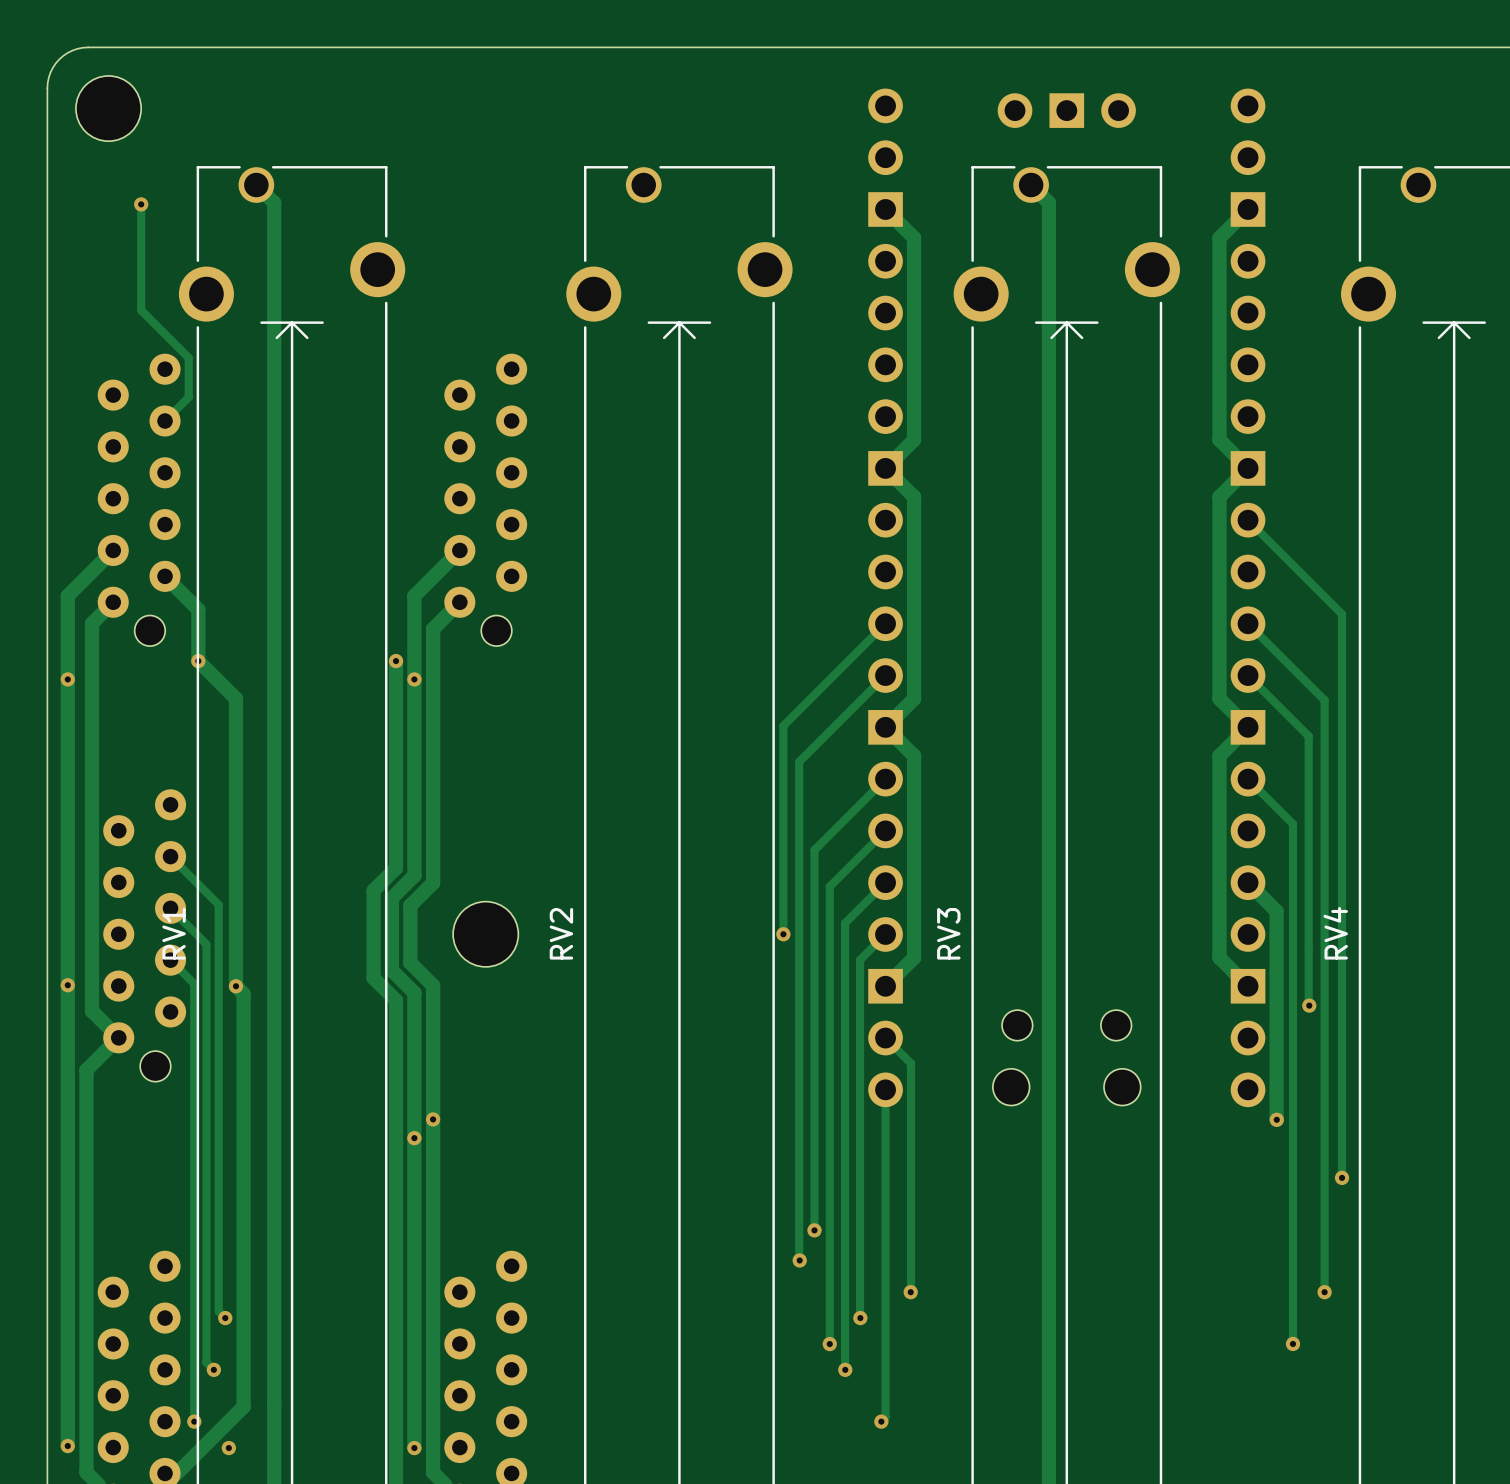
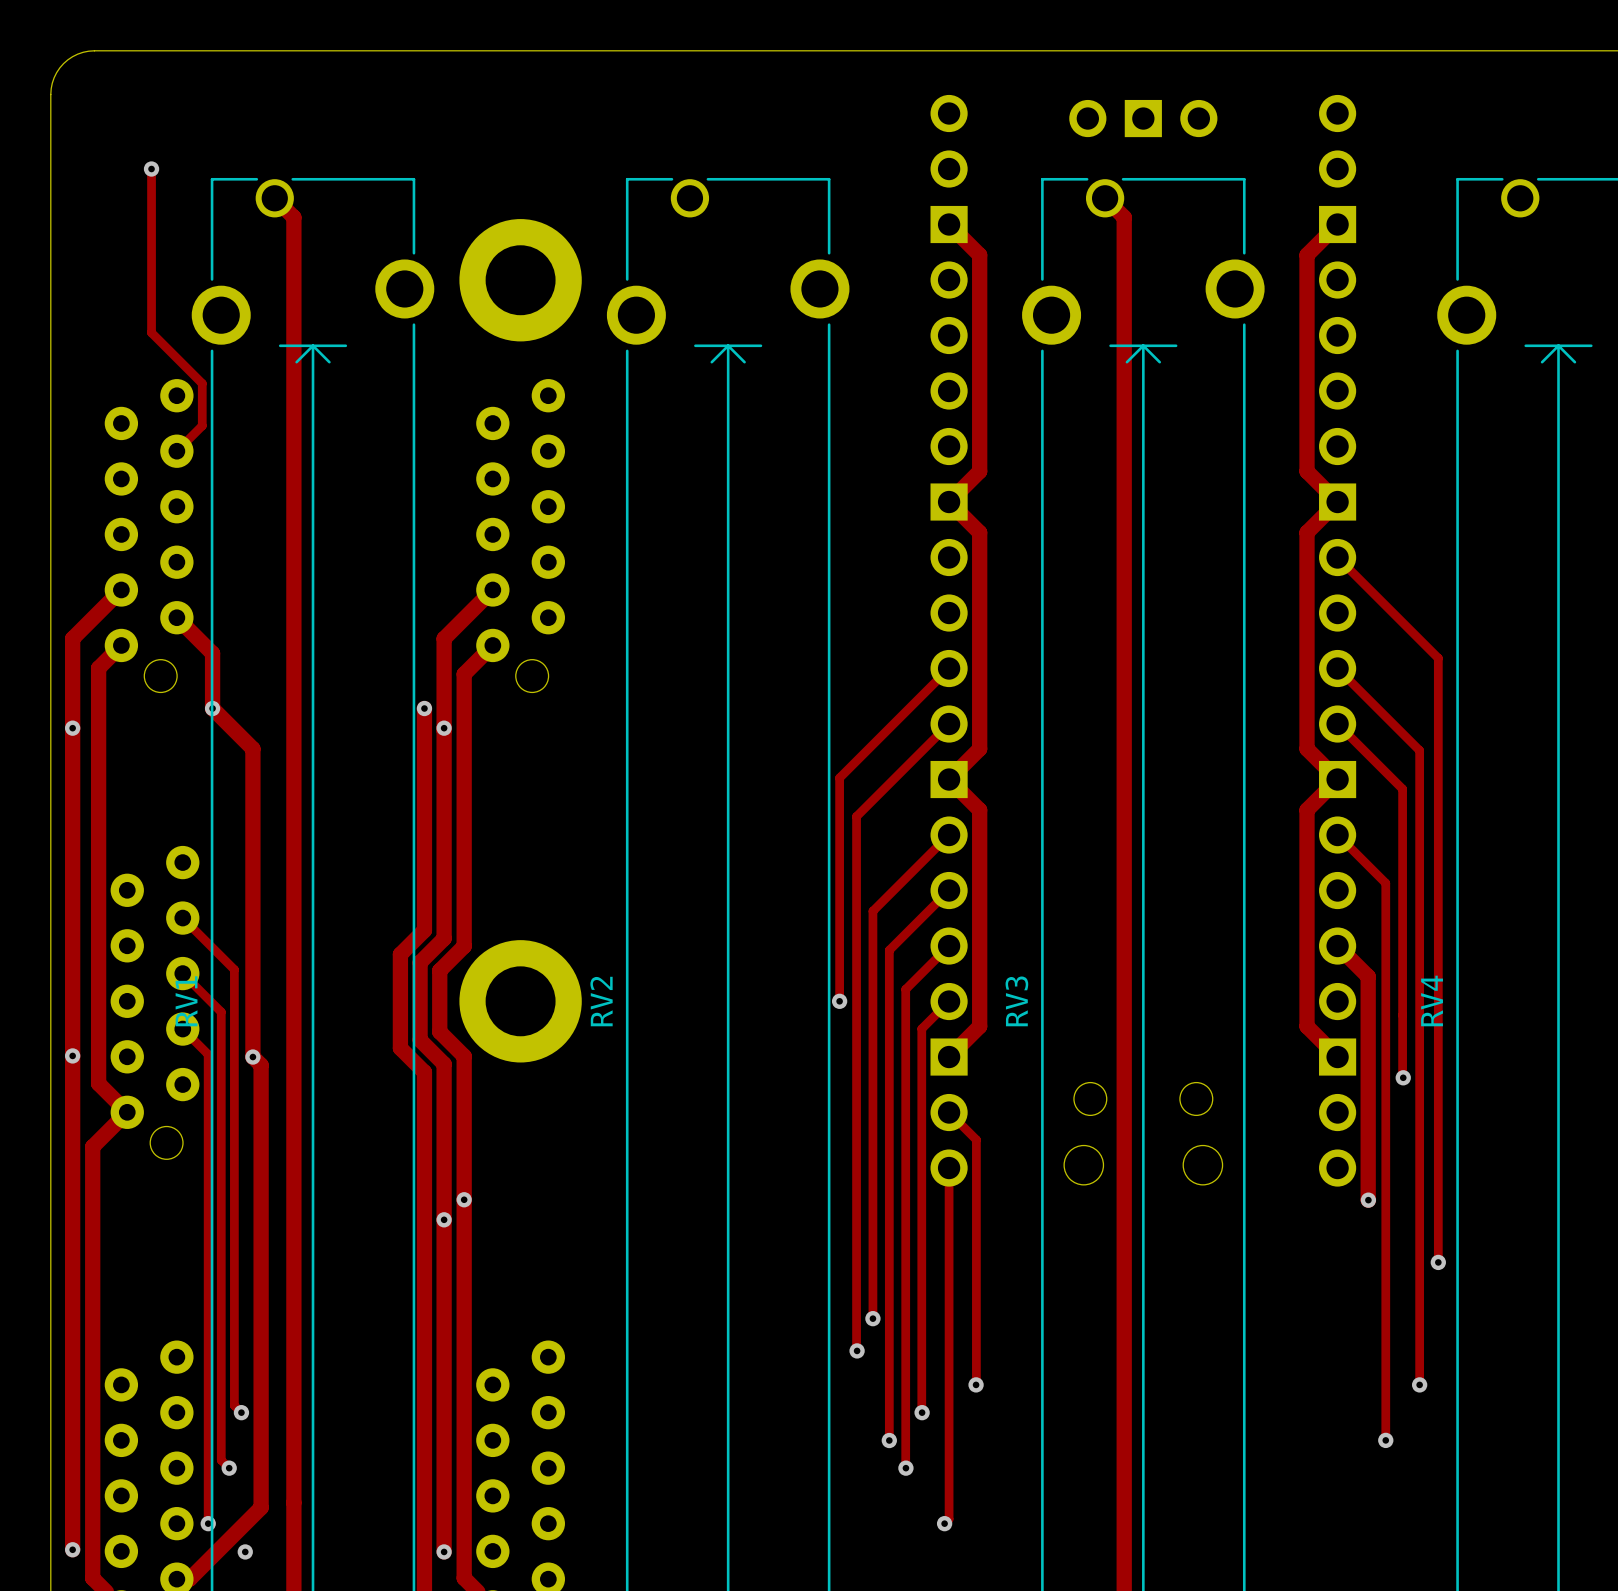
part: (108, 108) -> none
track: (141, 204) (141, 310) -> (151, 169) (151, 332)
via position: (141, 204) -> (151, 169)
part: none -> (520, 280)
part footprint: [453, 901, 519, 967] -> [459, 940, 582, 1063]

